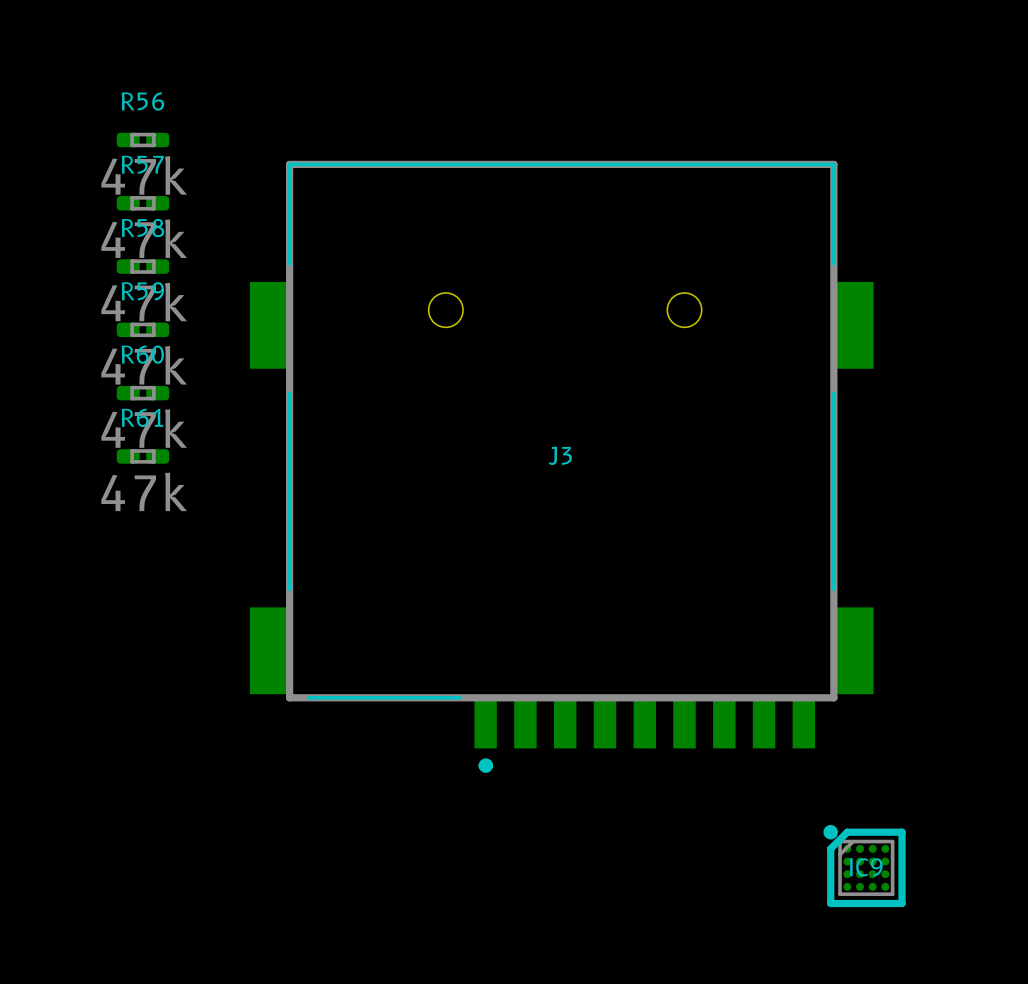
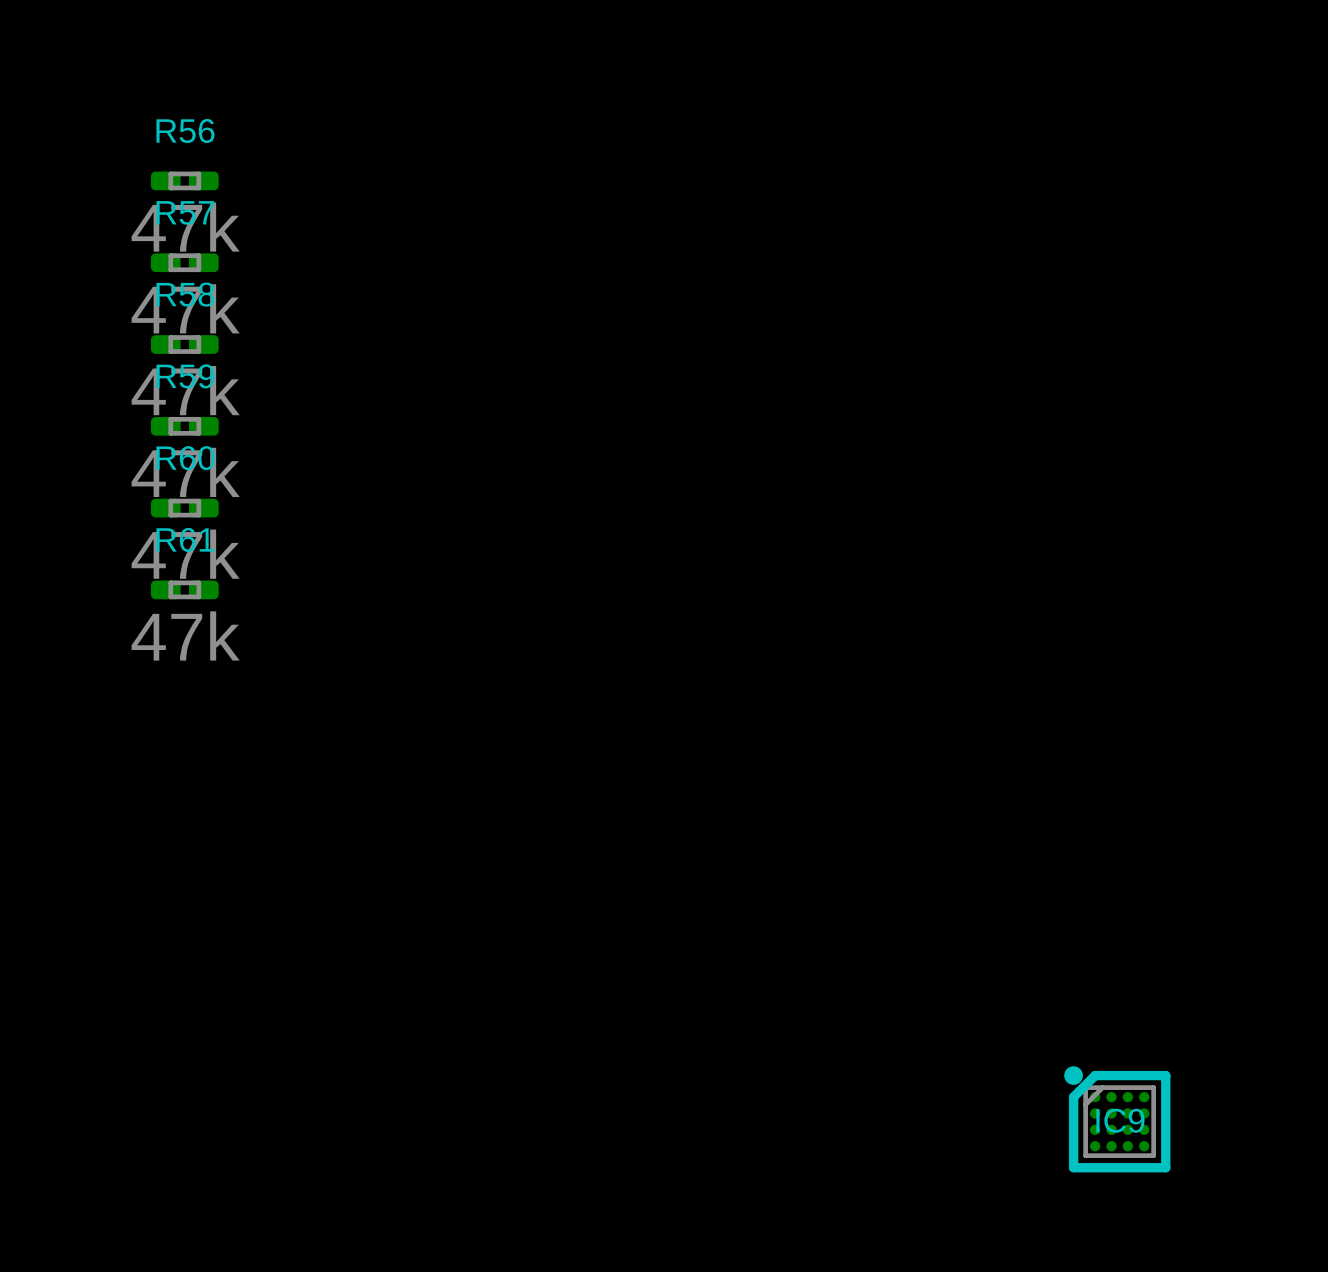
J3: (561, 466) -> none

